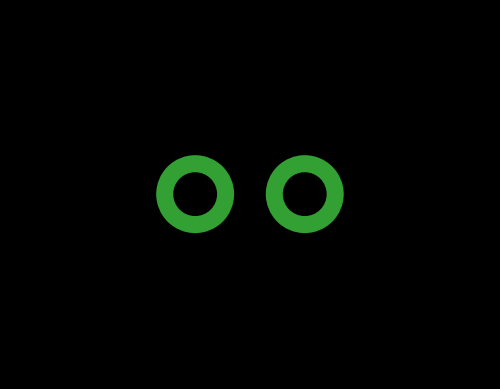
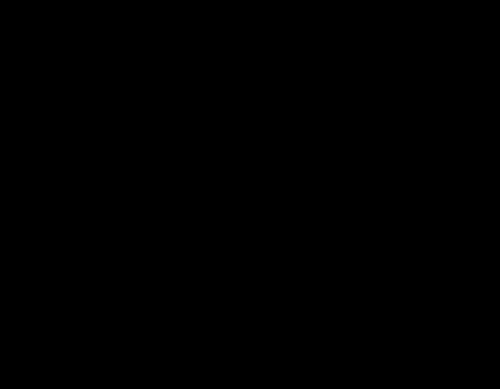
part: (249, 194) -> none

